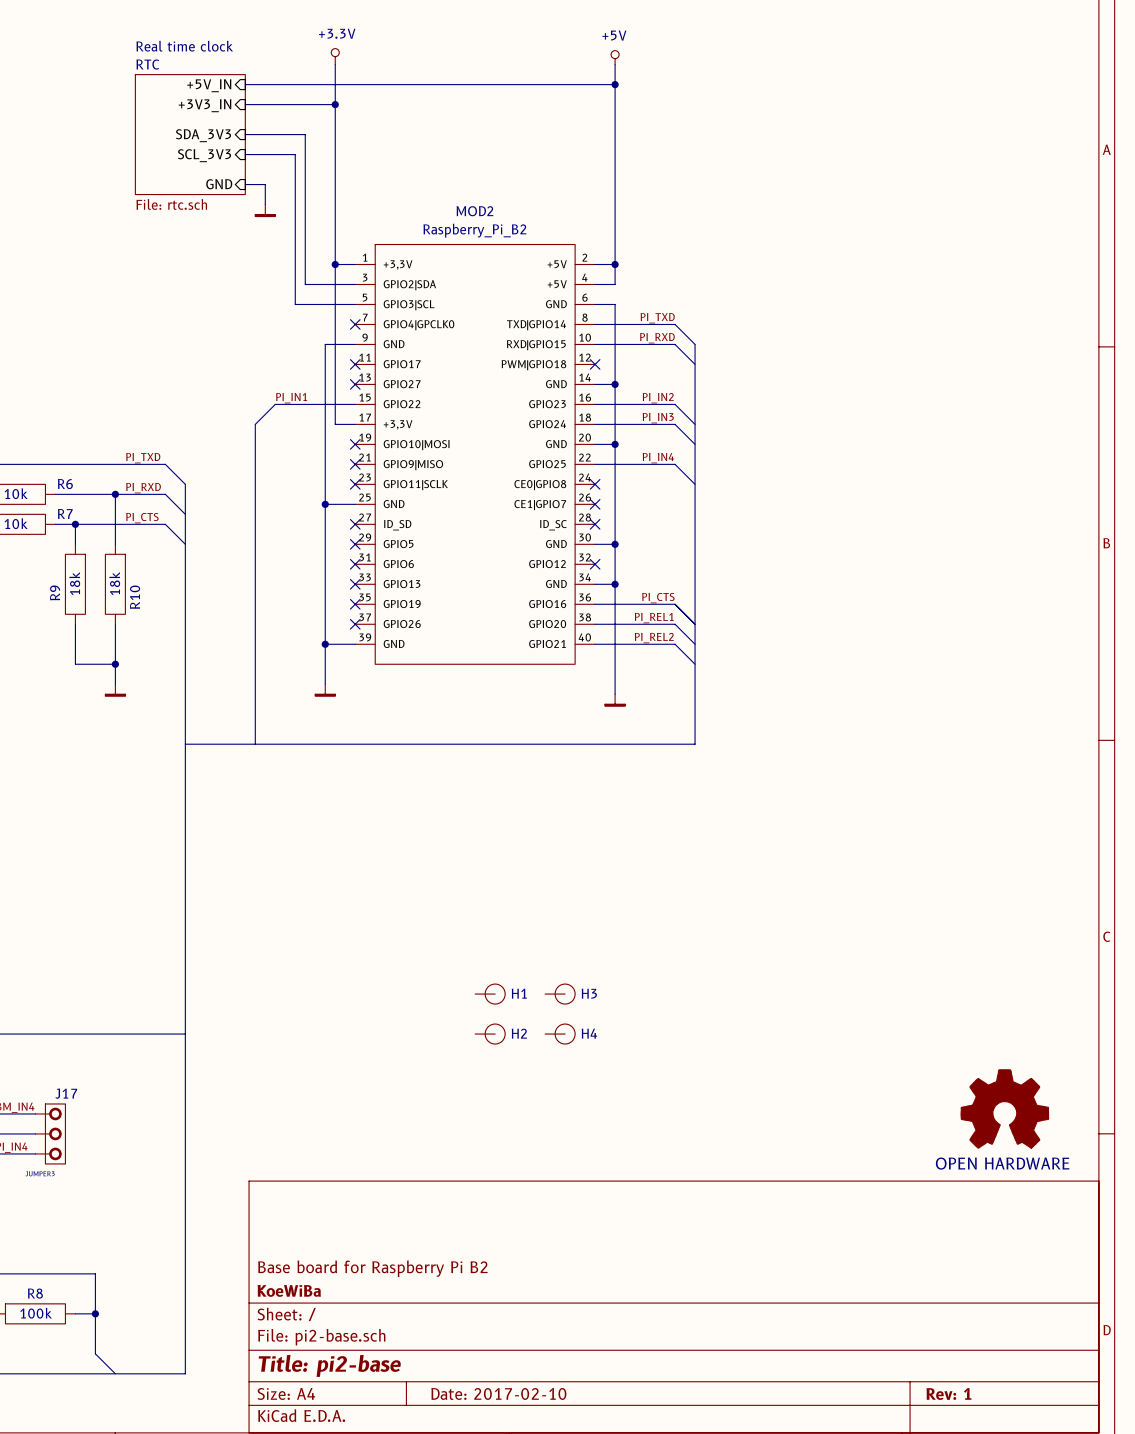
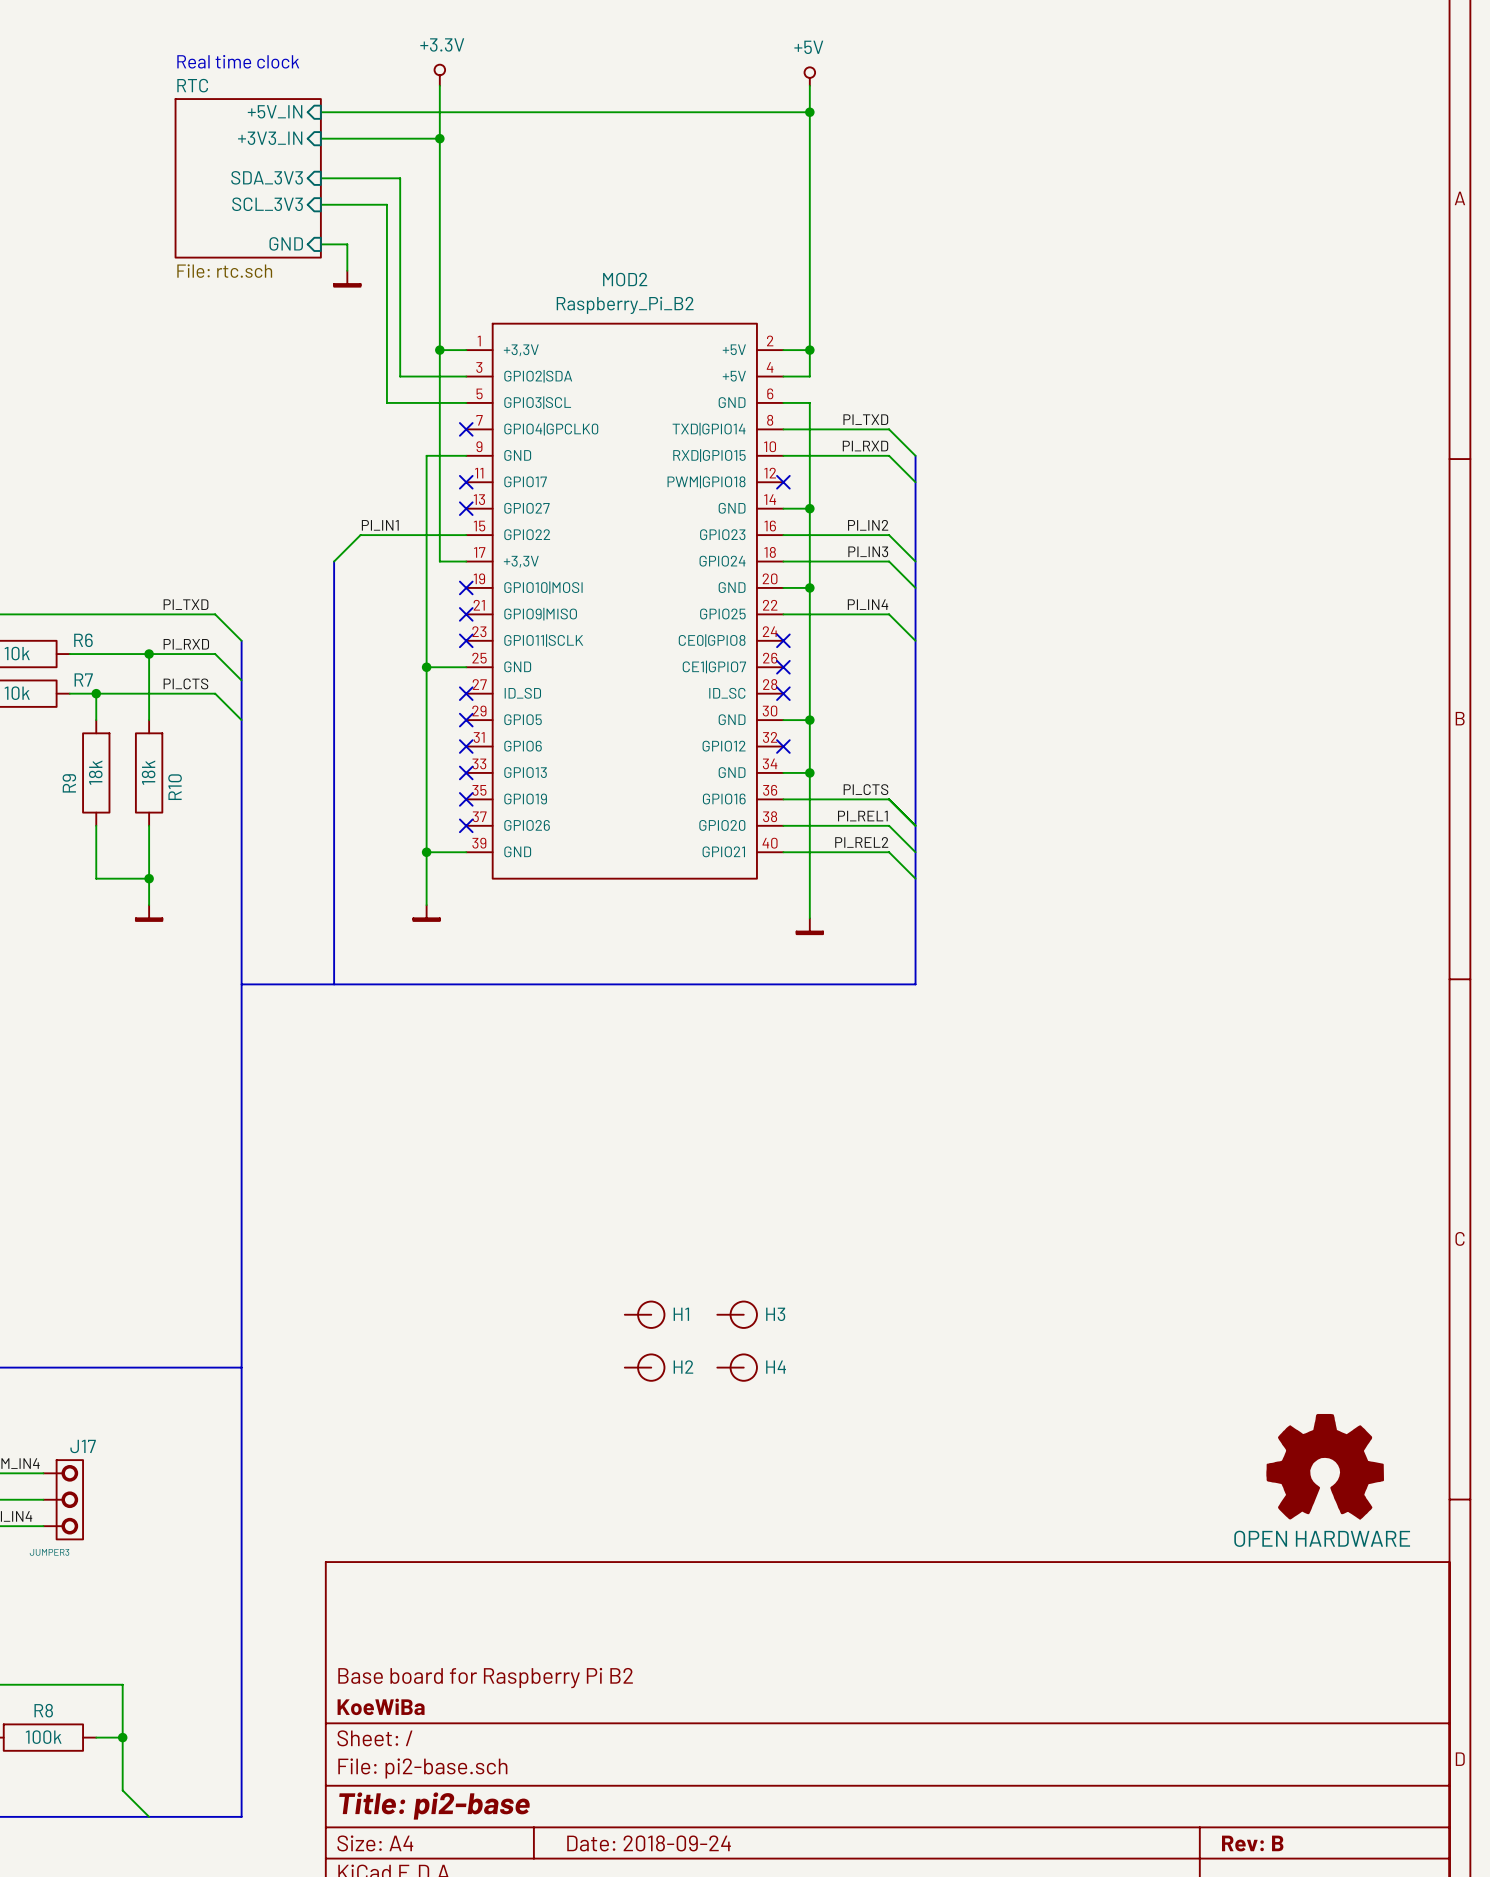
title block: Date: 2017-02-10 (498, 1393) -> Date: 2018-09-24 (649, 1843)
title block: Rev: 1 (948, 1394) -> Rev: B (1252, 1843)

